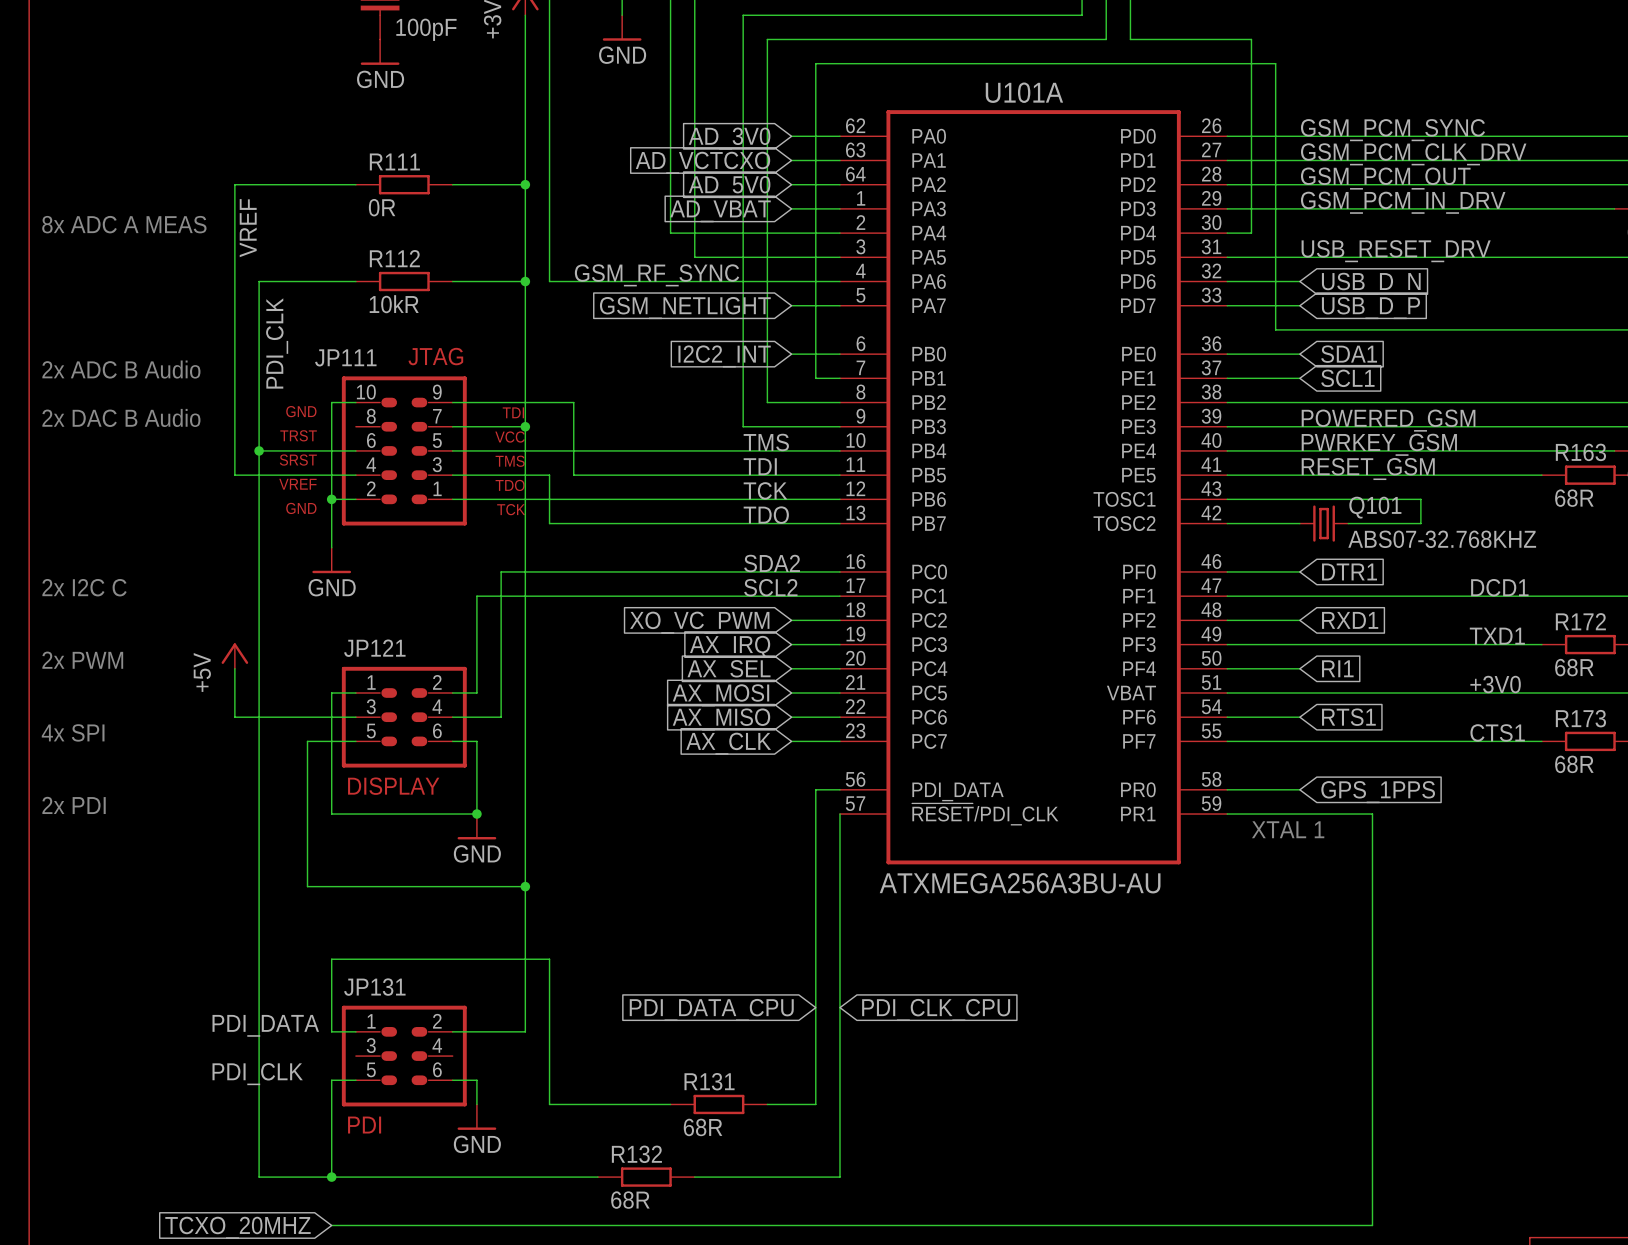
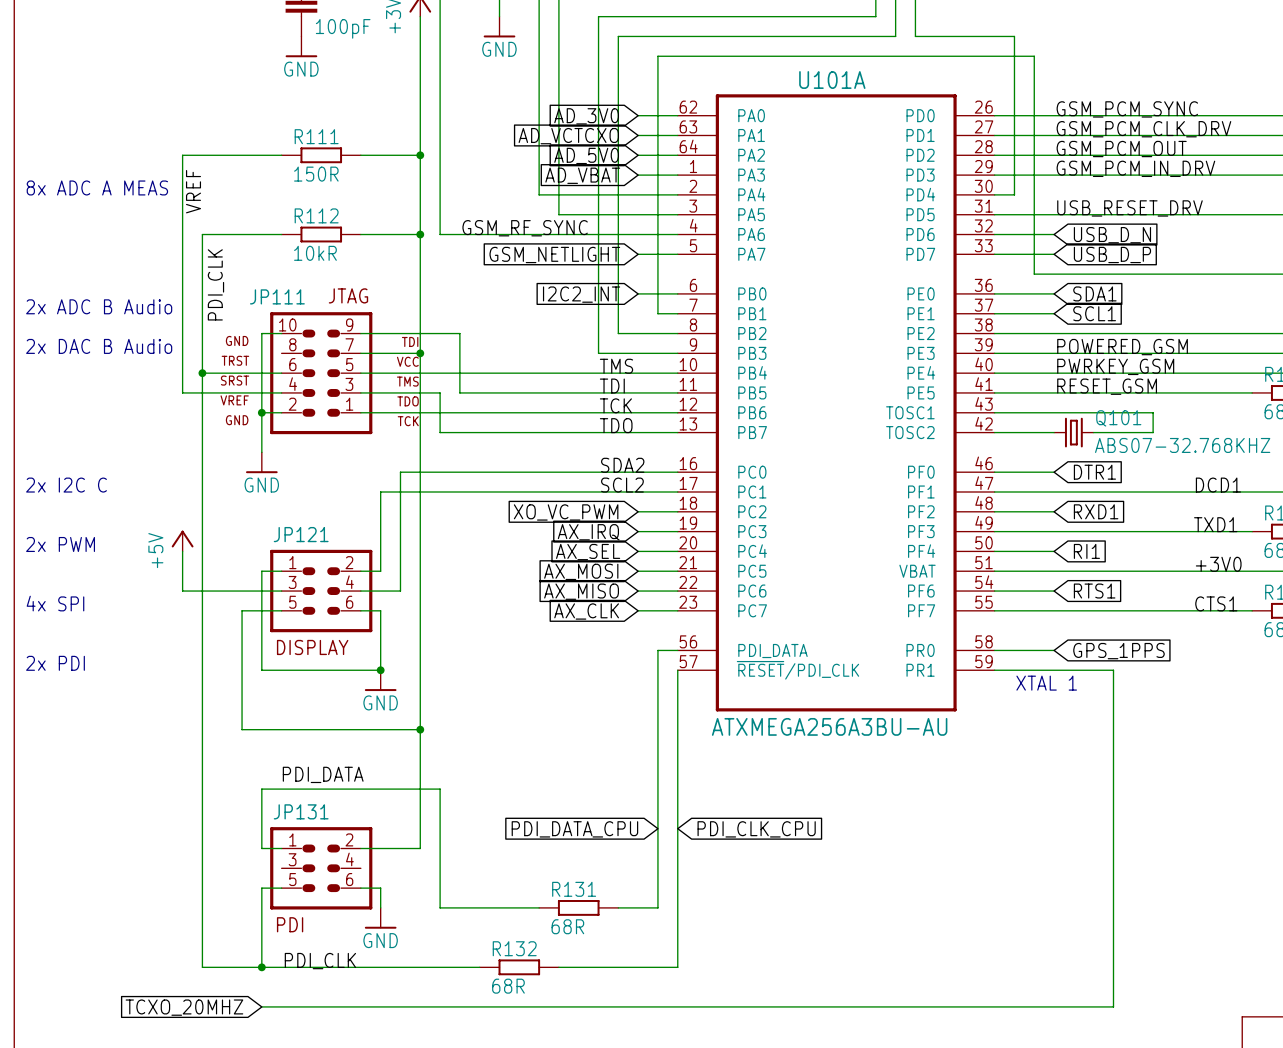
R111 value: 0R (382, 207) -> 150R (316, 174)
label position: PDI_DATA (265, 1025) -> PDI_DATA (323, 774)
label position: PDI_CLK (257, 1074) -> PDI_CLK (320, 961)

